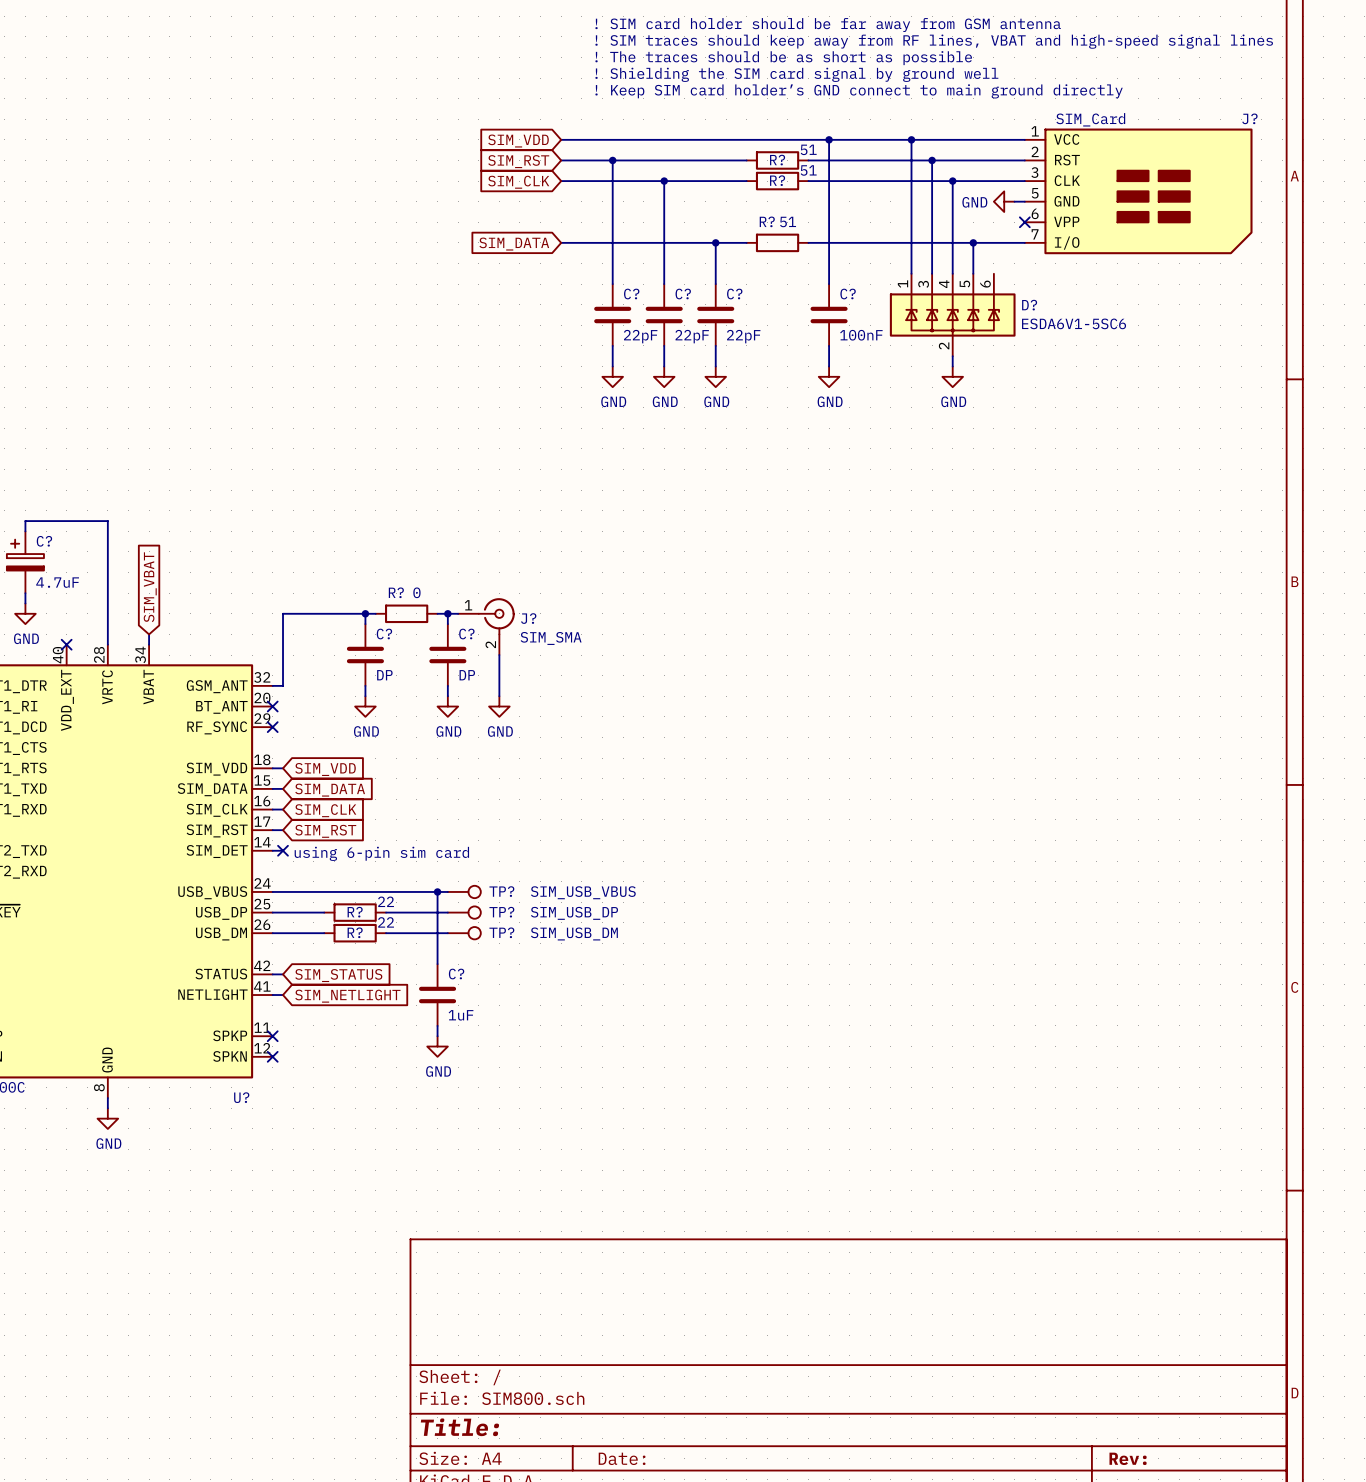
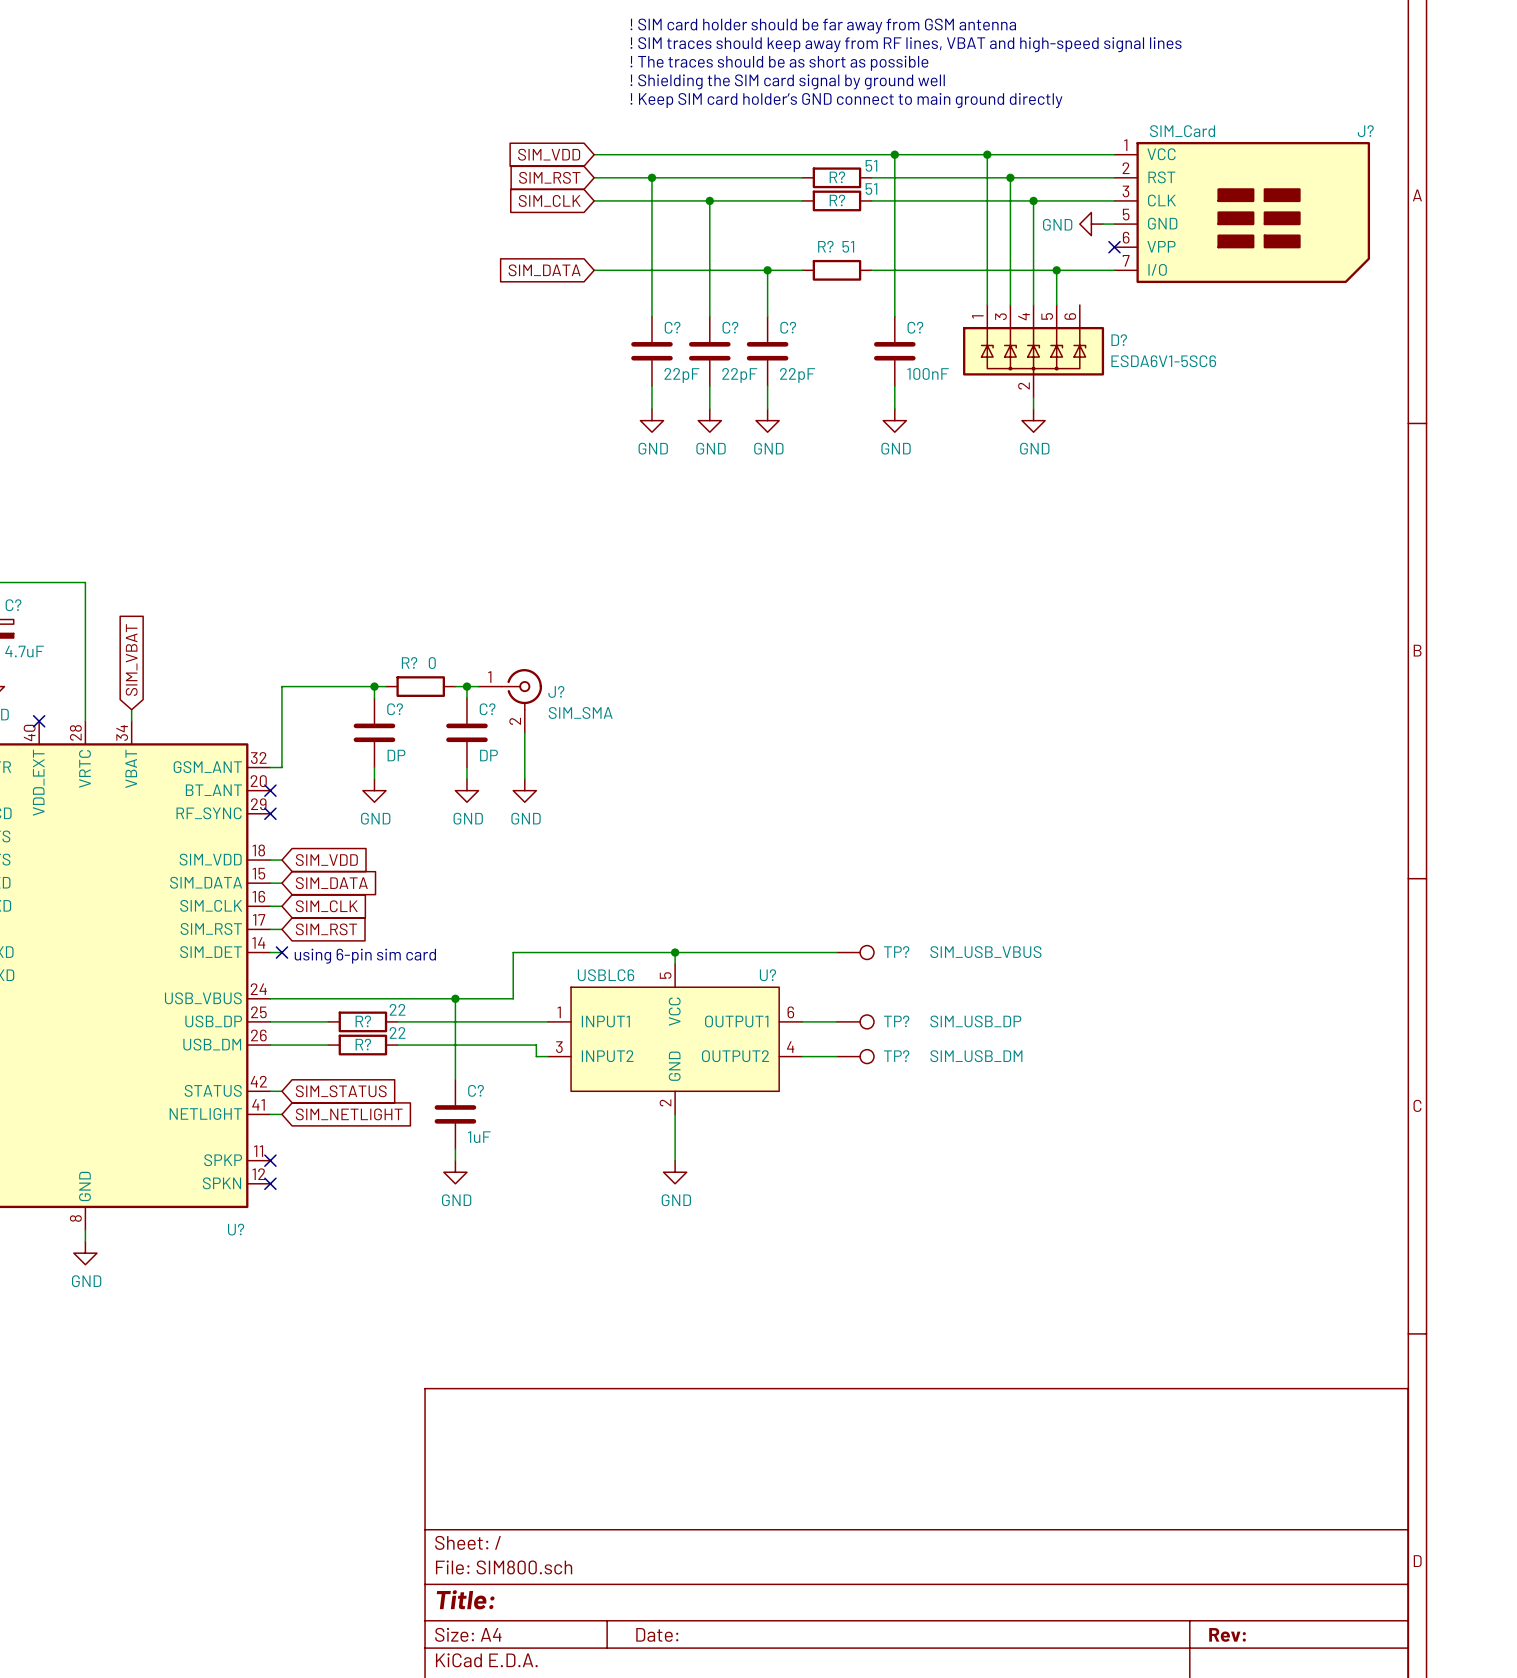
wire: none -> (675, 952) (675, 964)
junction: none -> (675, 952)
wire: none -> (836, 952) (513, 952) (513, 998) (466, 998)
TP?: none -> SIM_USB_VBUS (855, 952)
TP?: SIM_USB_VBUS (464, 891) -> none
wire: none -> (466, 1021) (547, 1021)
TP?: SIM_USB_DP (464, 912) -> none
wire: none -> (802, 1021) (836, 1021)
TP?: none -> SIM_USB_DP (855, 1021)
U?: none -> USBLC6 (675, 1039)
wire: none -> (466, 1045) (536, 1045) (536, 1056) (547, 1056)
TP?: SIM_USB_DM (464, 933) -> none
wire: none -> (802, 1056) (836, 1056)
TP?: none -> SIM_USB_DM (855, 1056)
wire: none -> (675, 1114) (675, 1160)
power symbol: none -> GND (675, 1172)

